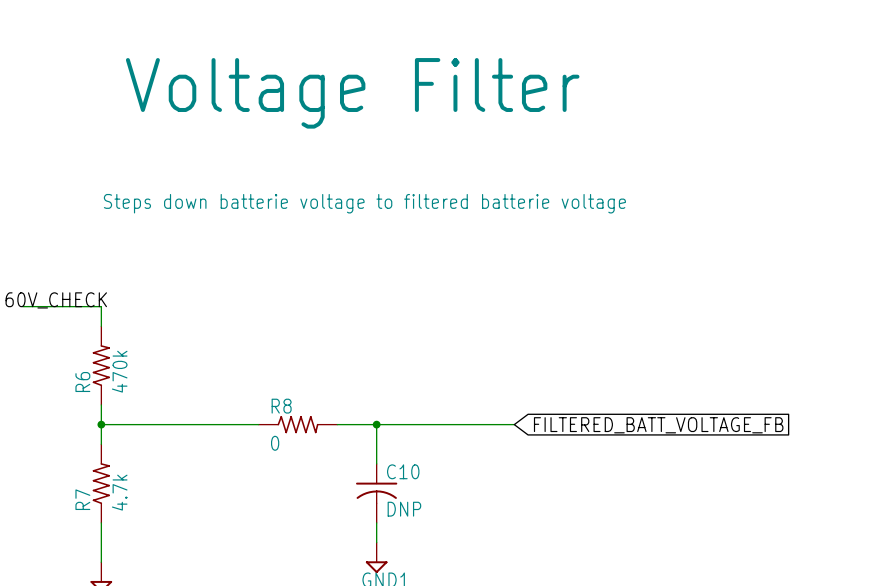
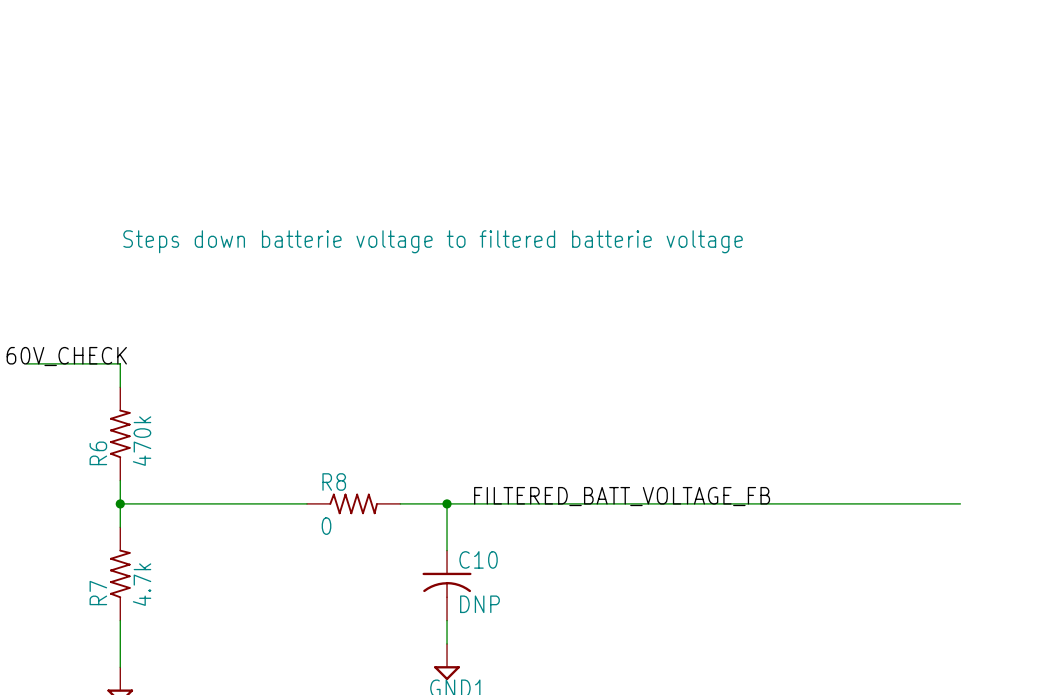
text: Voltage Filter (352, 93) -> none
label: none -> FILTERED_BATT_VOLTAGE_FB (622, 496)
wire: none -> (610, 503) (960, 503)
global label: FILTERED_BATT_VOLTAGE_FB (658, 425) -> none

